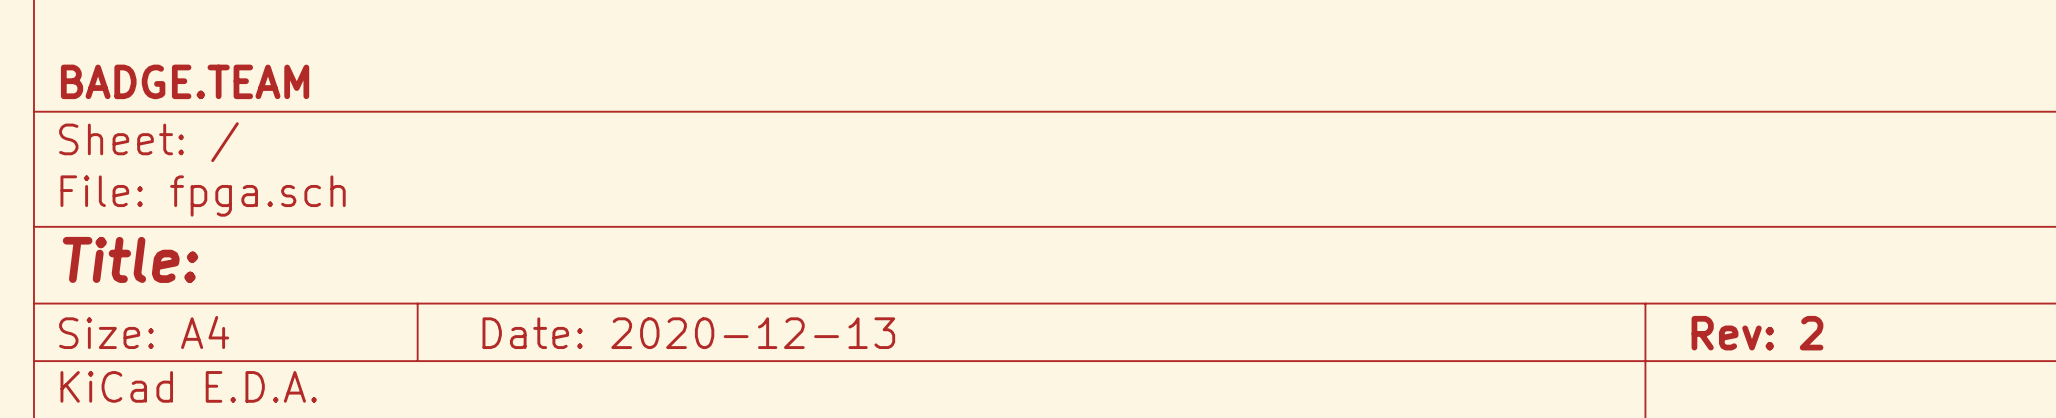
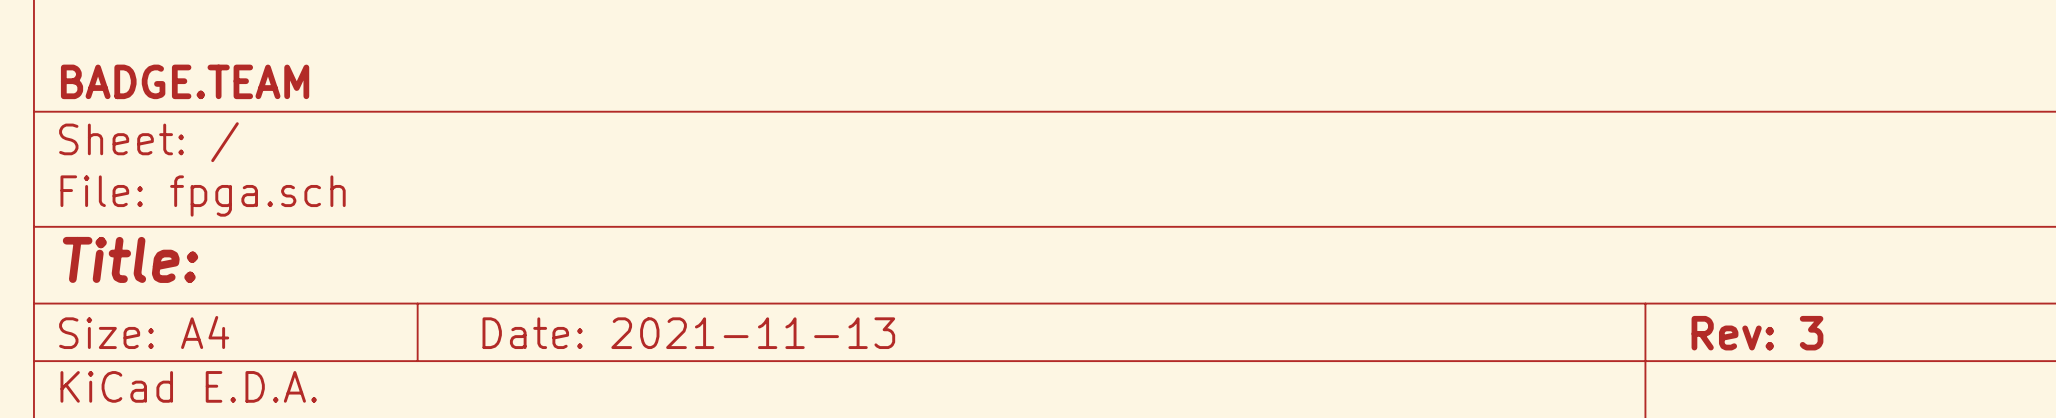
title block: Date: 2020-12-13 (688, 333) -> Date: 2021-11-13 (688, 333)
title block: Rev: 2 (1757, 333) -> Rev: 3 (1757, 333)

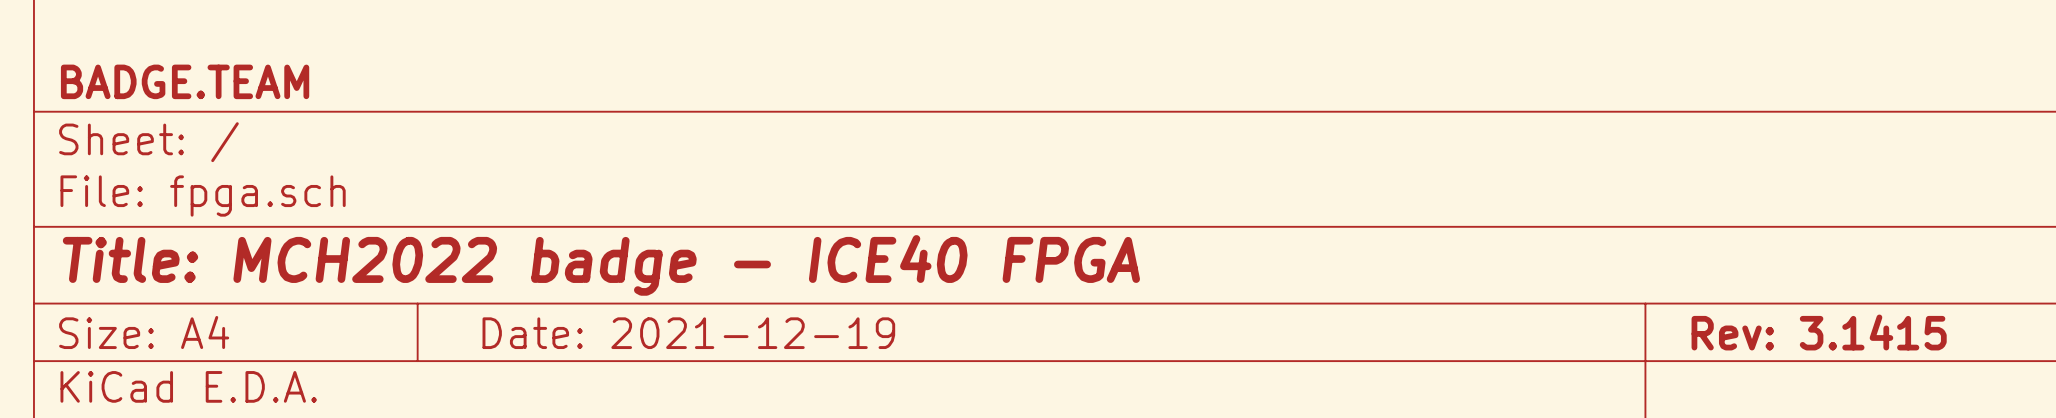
title block: Title: (130, 259) -> Title: MCH2022 badge - ICE40 FPGA (601, 265)
title block: Date: 2021-11-13 (688, 333) -> Date: 2021-12-19 (688, 333)
title block: Rev: 3 (1757, 333) -> Rev: 3.1415 (1819, 332)

